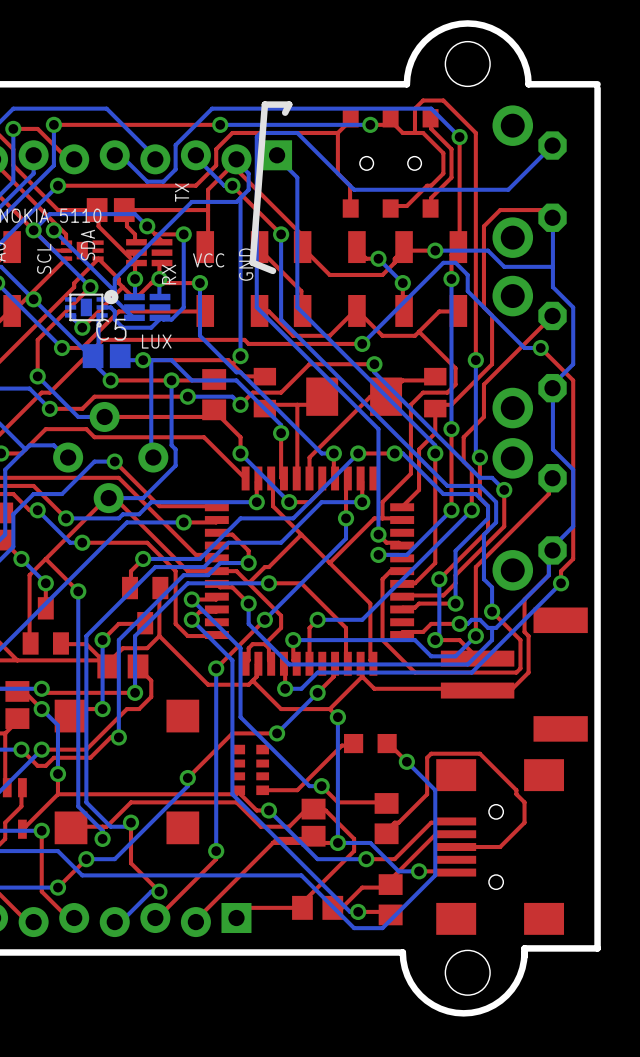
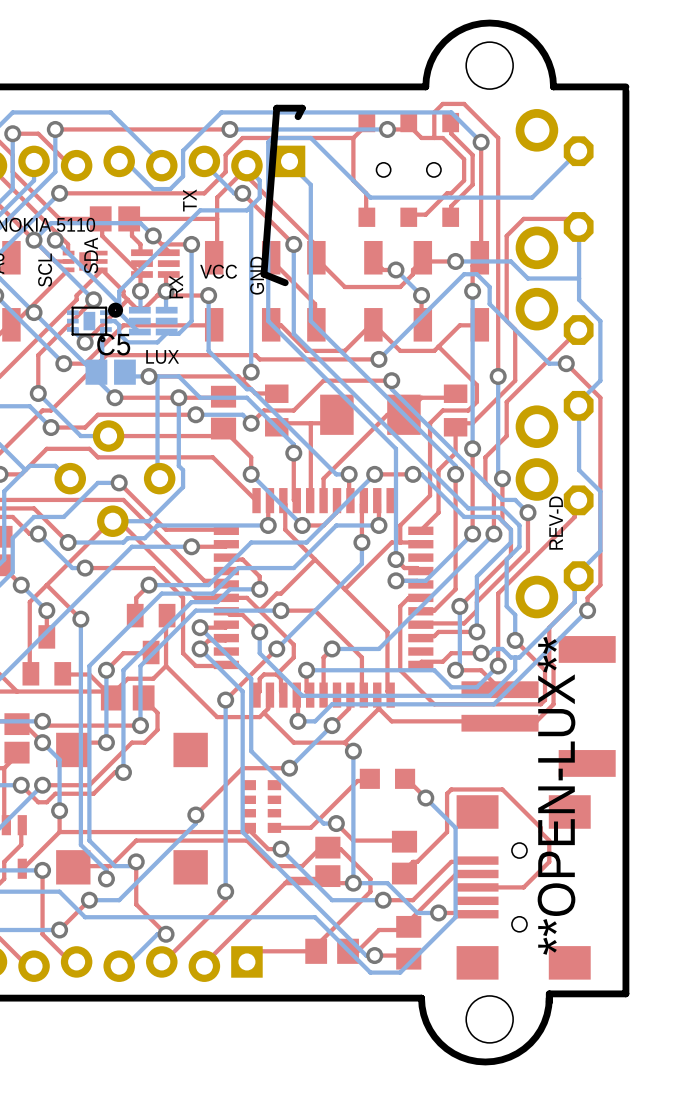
text: none -> REV-D (556, 523)
text: none -> **OPEN-LUX** (556, 795)

